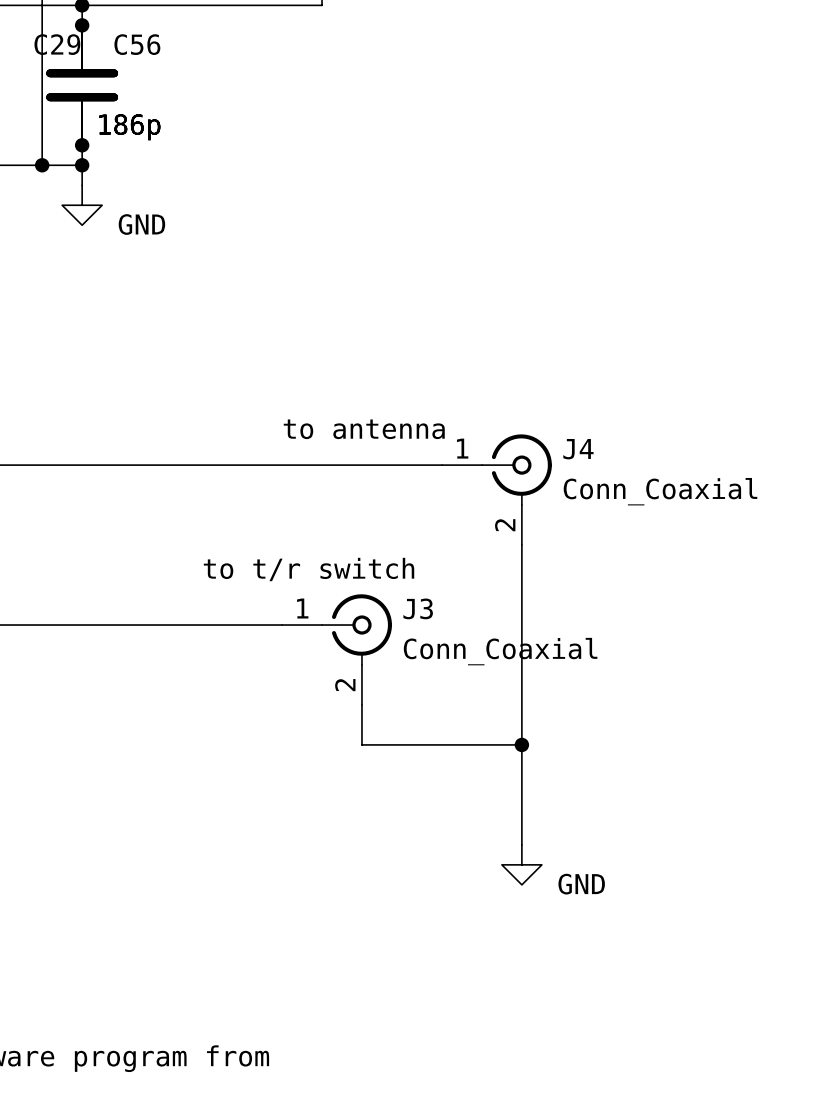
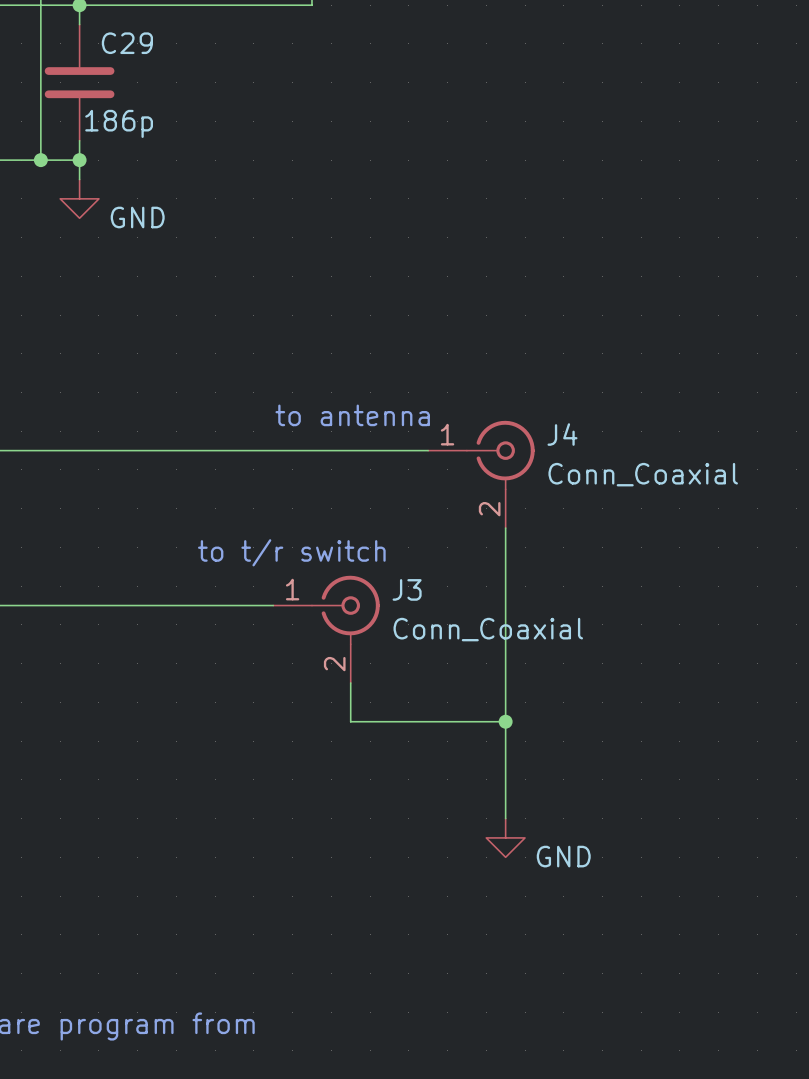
junction: (82, 25) -> none
C29 name position: C29 (57, 44) -> C29 (127, 43)
C56: 186p (82, 85) -> none
junction: (82, 145) -> none

